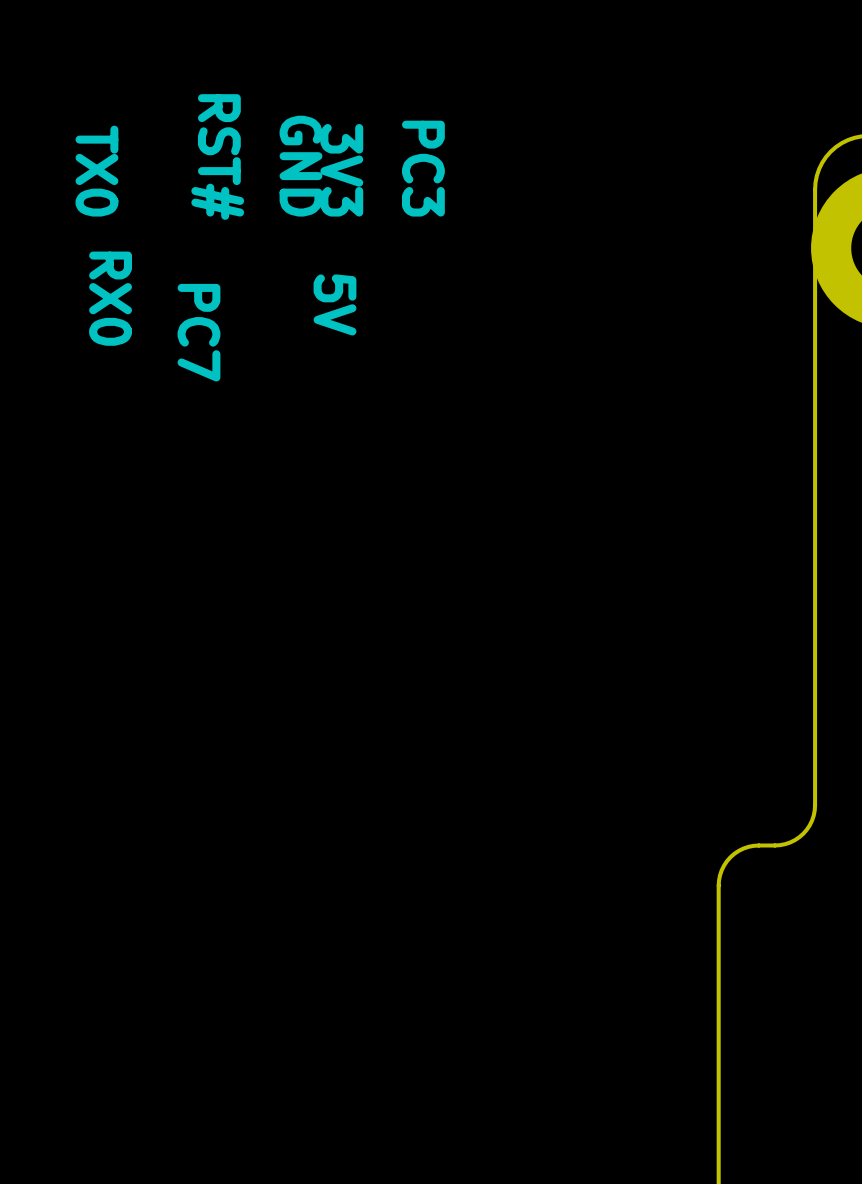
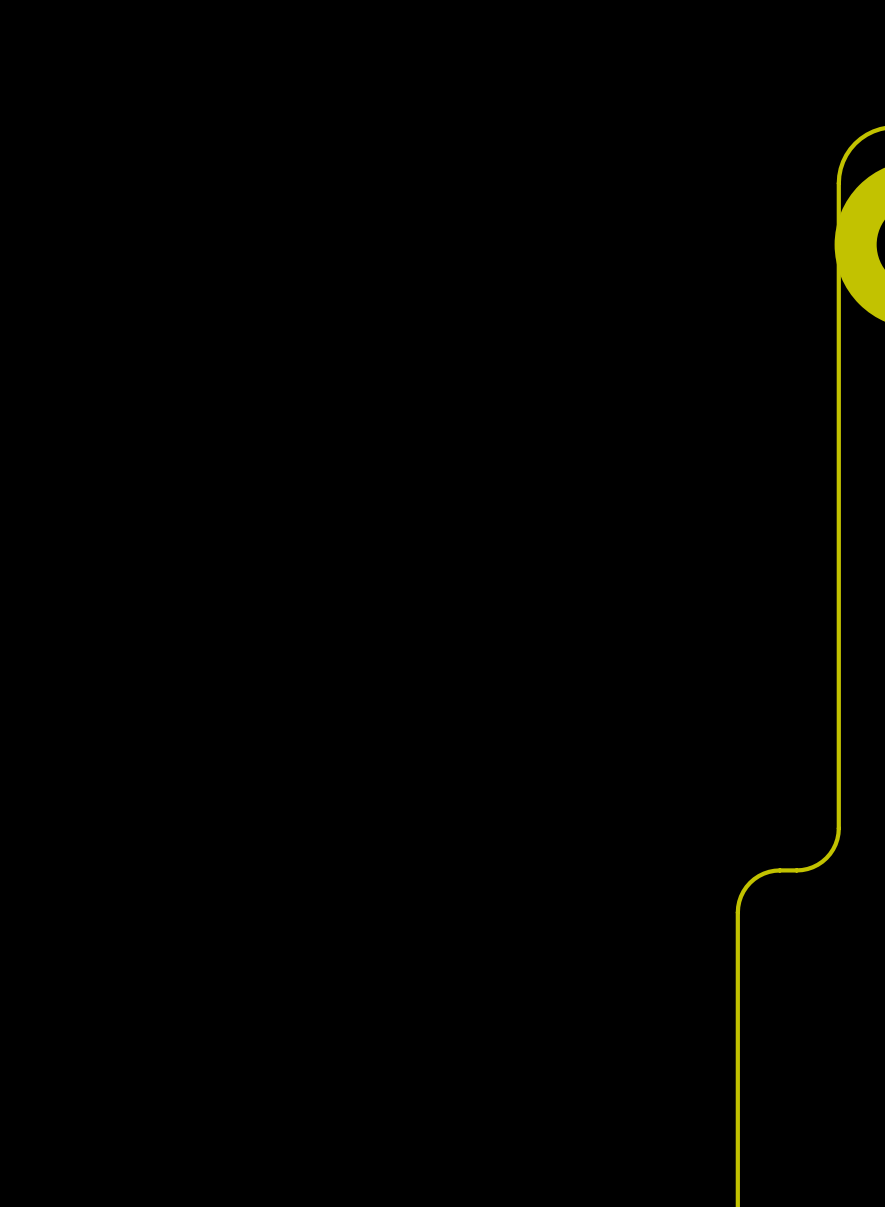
text: RST# (217, 157) -> none
text: GND (300, 166) -> none
text: PC3 (423, 168) -> none
text: 3V3 (341, 170) -> none
text: TX0 (96, 171) -> none
text: RX0 (110, 298) -> none
text: 5V (335, 304) -> none
text: PC7 (198, 332) -> none

